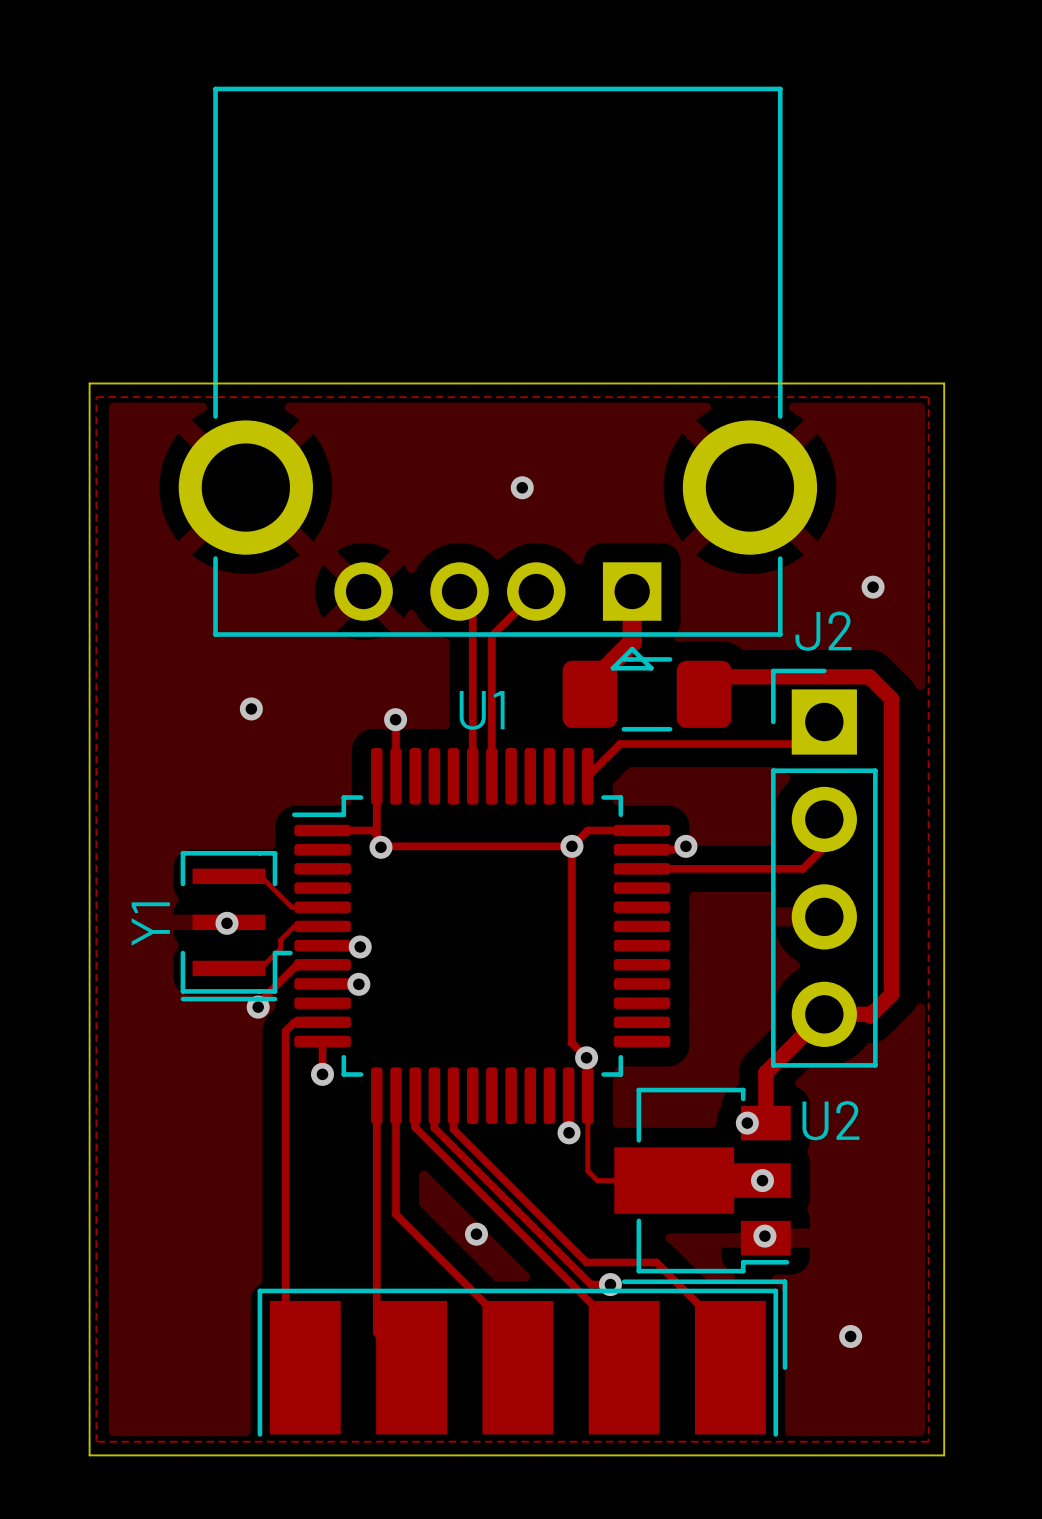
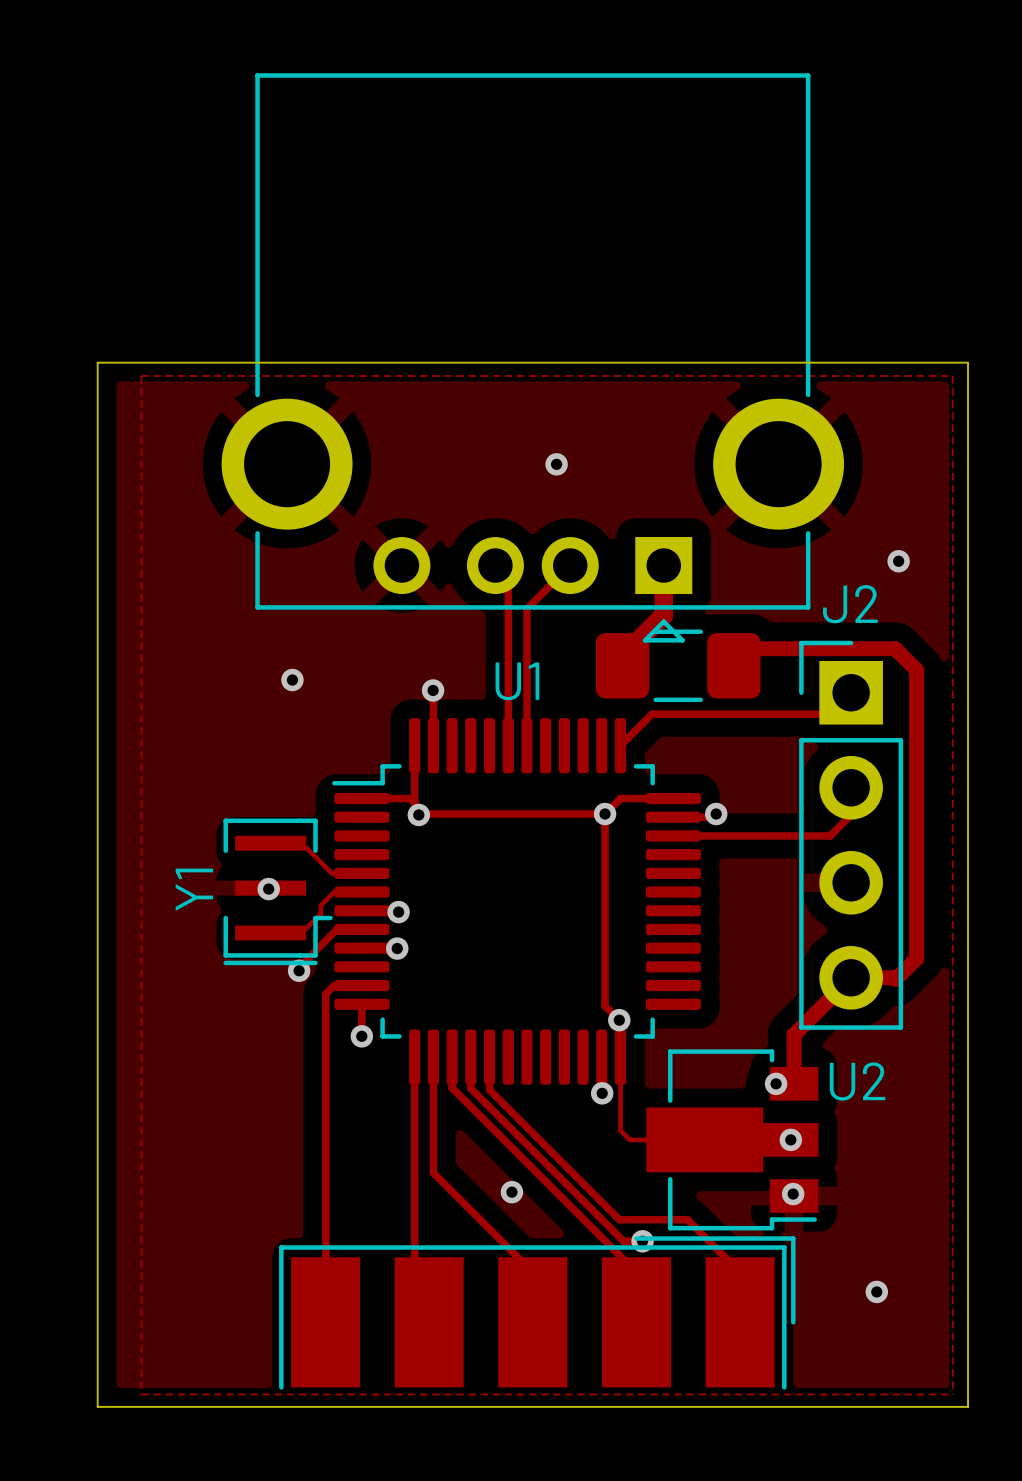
board edge: (89, 383) (89, 1455) (944, 1454) -> (134, 362) (97, 362) (97, 1406) (968, 1406)
part position: (522, 1358) -> (537, 1312)

